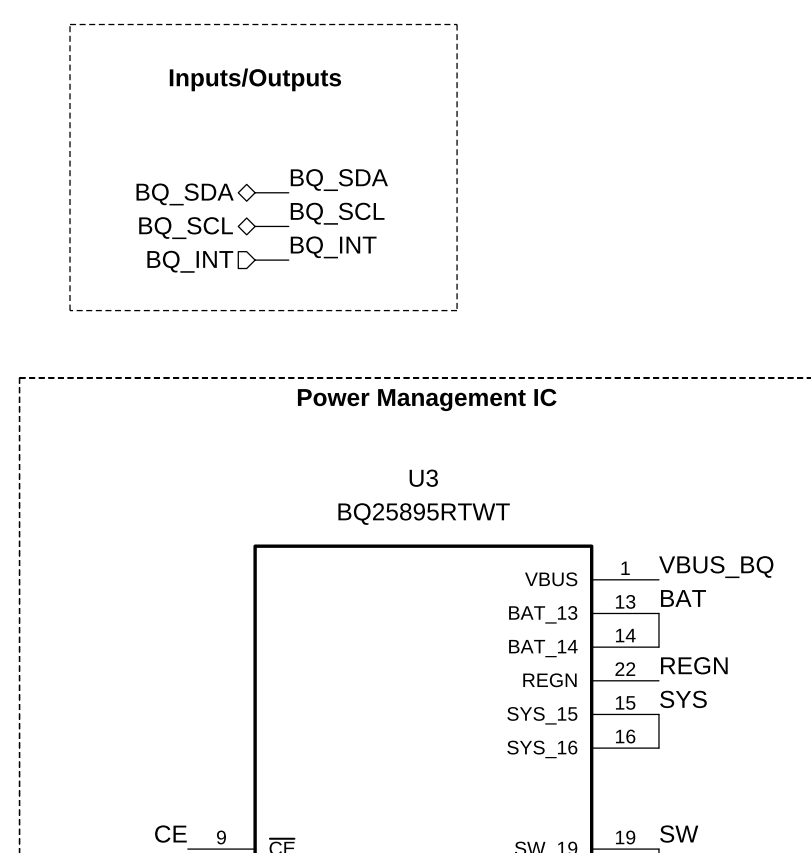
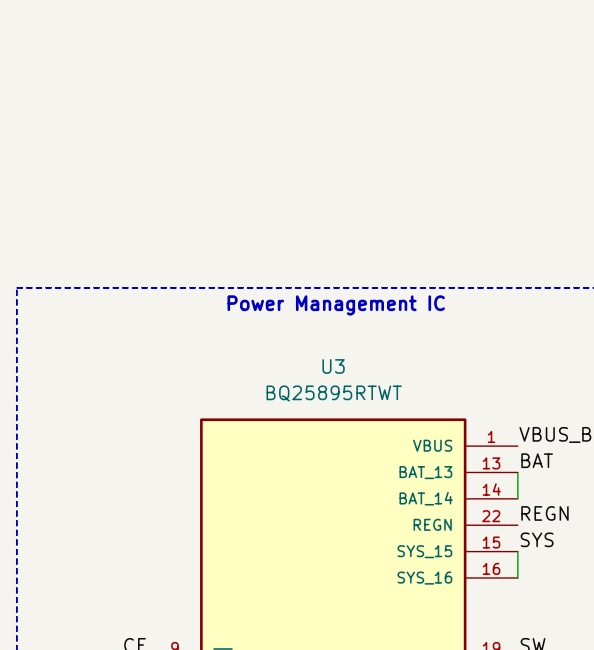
line: (70, 24) (457, 24) (457, 310) (70, 310) (70, 24) -> none
text: Inputs/Outputs (255, 79) -> none
label: BQ_SDA (339, 180) -> none
wire: (255, 192) (288, 192) -> none
hierarchical label: BQ_SDA (185, 194) -> none
label: BQ_SCL (337, 213) -> none
wire: (255, 226) (288, 226) -> none
hierarchical label: BQ_SCL (186, 228) -> none
label: BQ_INT (333, 247) -> none
wire: (255, 260) (288, 260) -> none
hierarchical label: BQ_INT (190, 261) -> none

